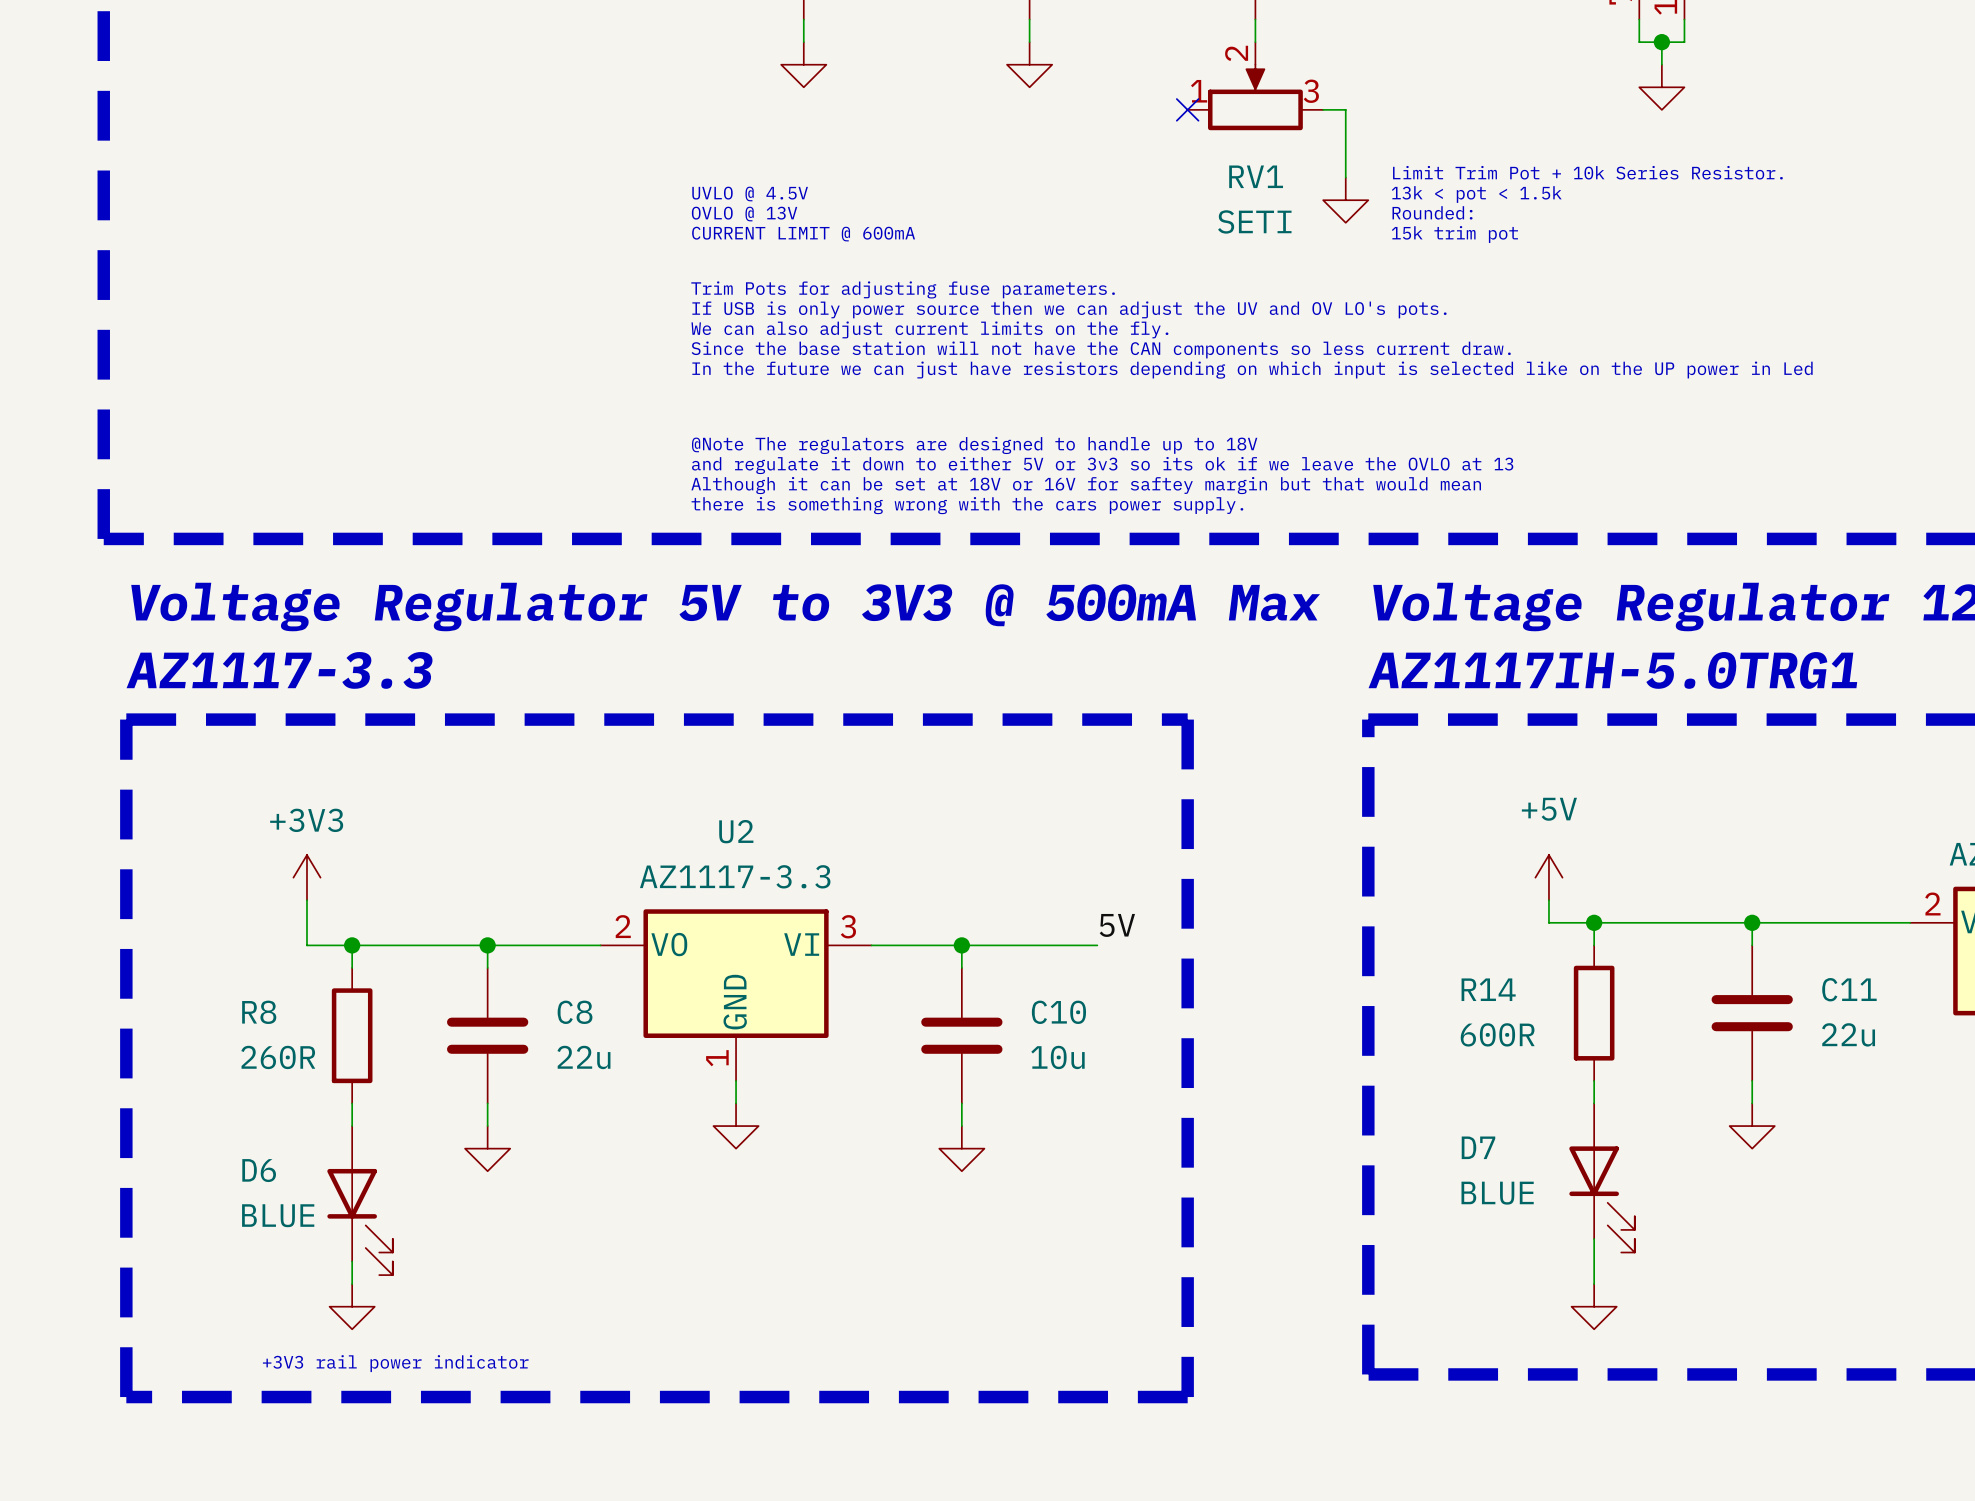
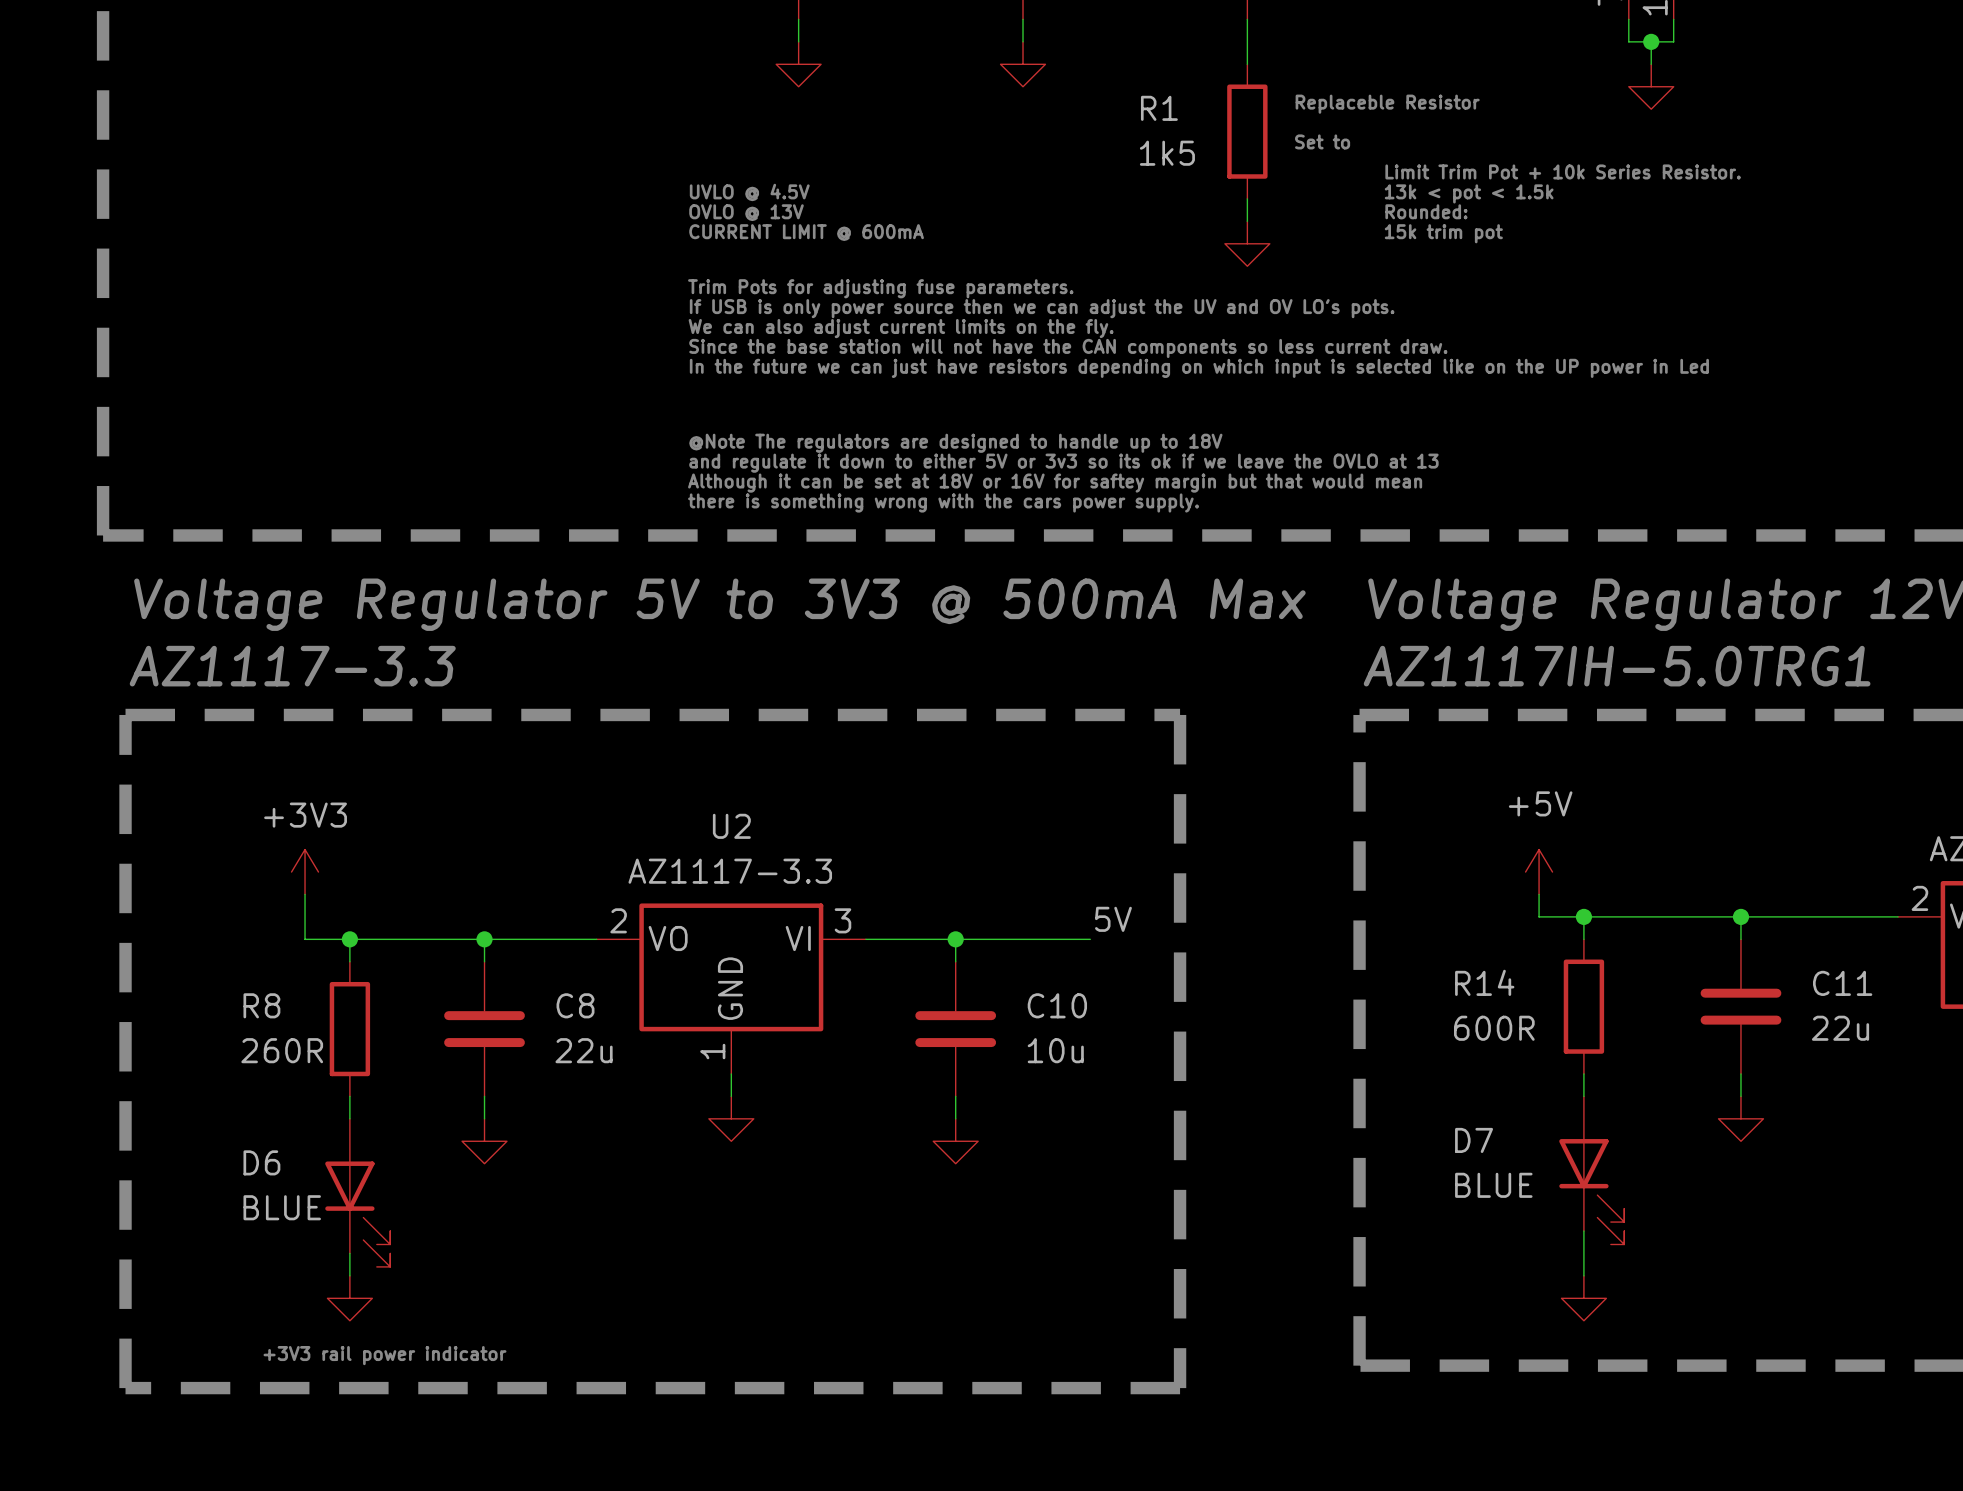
RV1: SETI (1255, 86) -> none
text: none -> Replaceble Resistor (1387, 104)
no-connect mark: (1187, 109) -> none
wire: (1323, 109) (1345, 109) (1345, 177) -> none
R1: none -> 1k5 (1247, 131)
text: none -> Set to (1322, 141)
wire: none -> (1247, 198) (1247, 221)
power symbol position: (1345, 200) -> (1247, 243)

